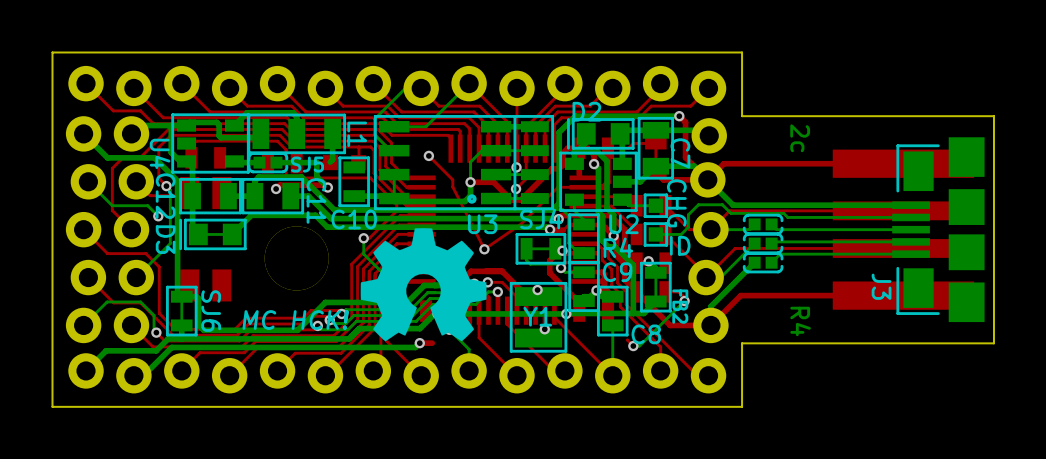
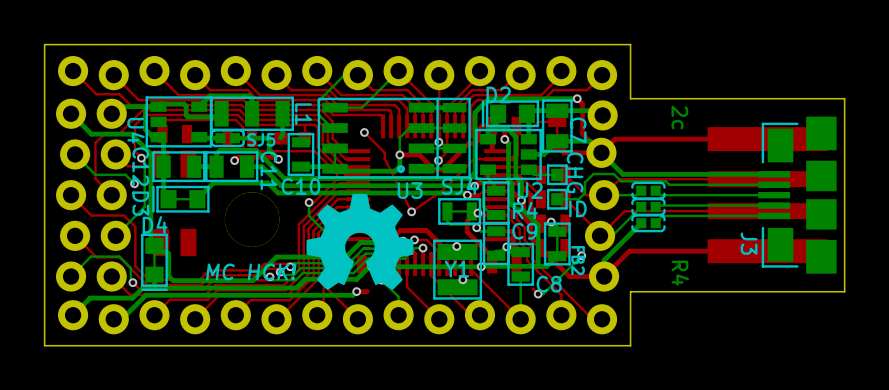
D4: none -> (154, 262)
SJ6: (181, 311) -> none

